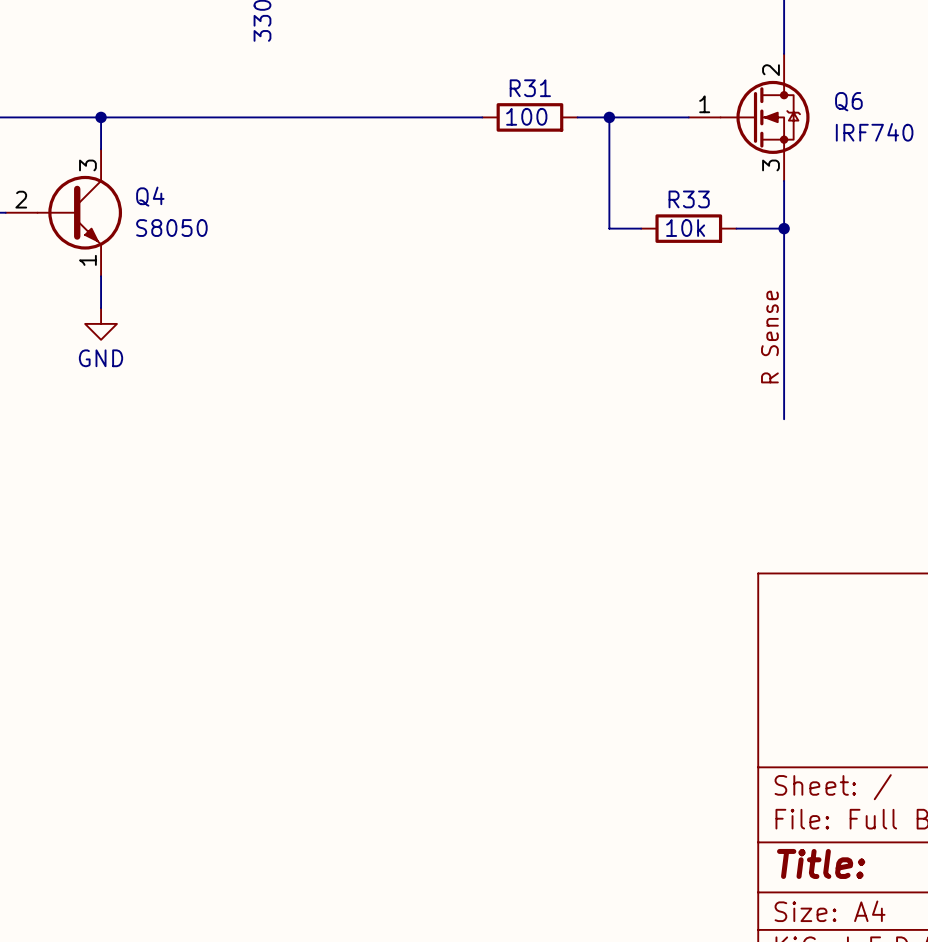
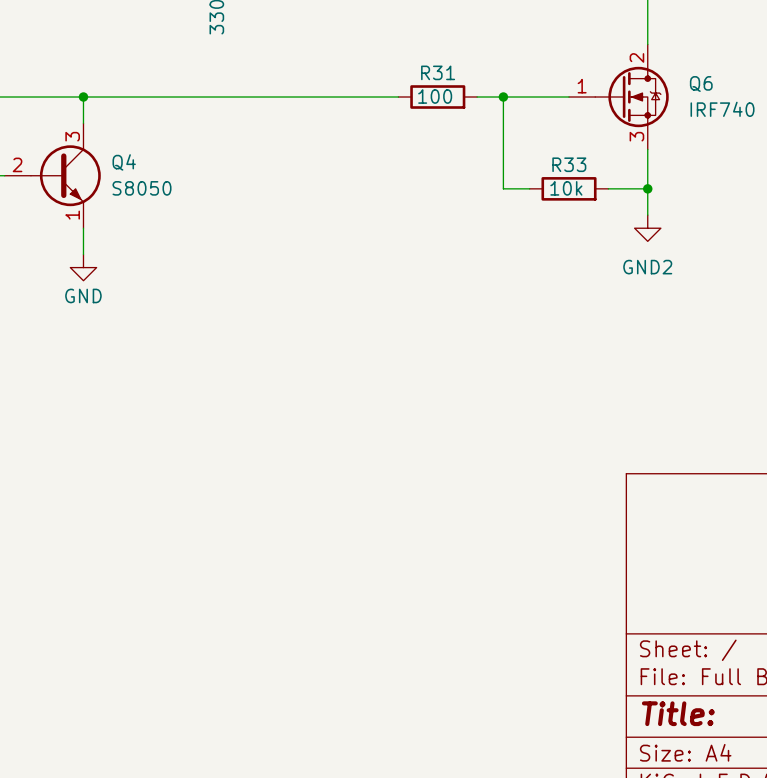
wire: (784, 260) (784, 419) -> none
power symbol: none -> GND2 (647, 228)
label: R Sense (769, 337) -> none

